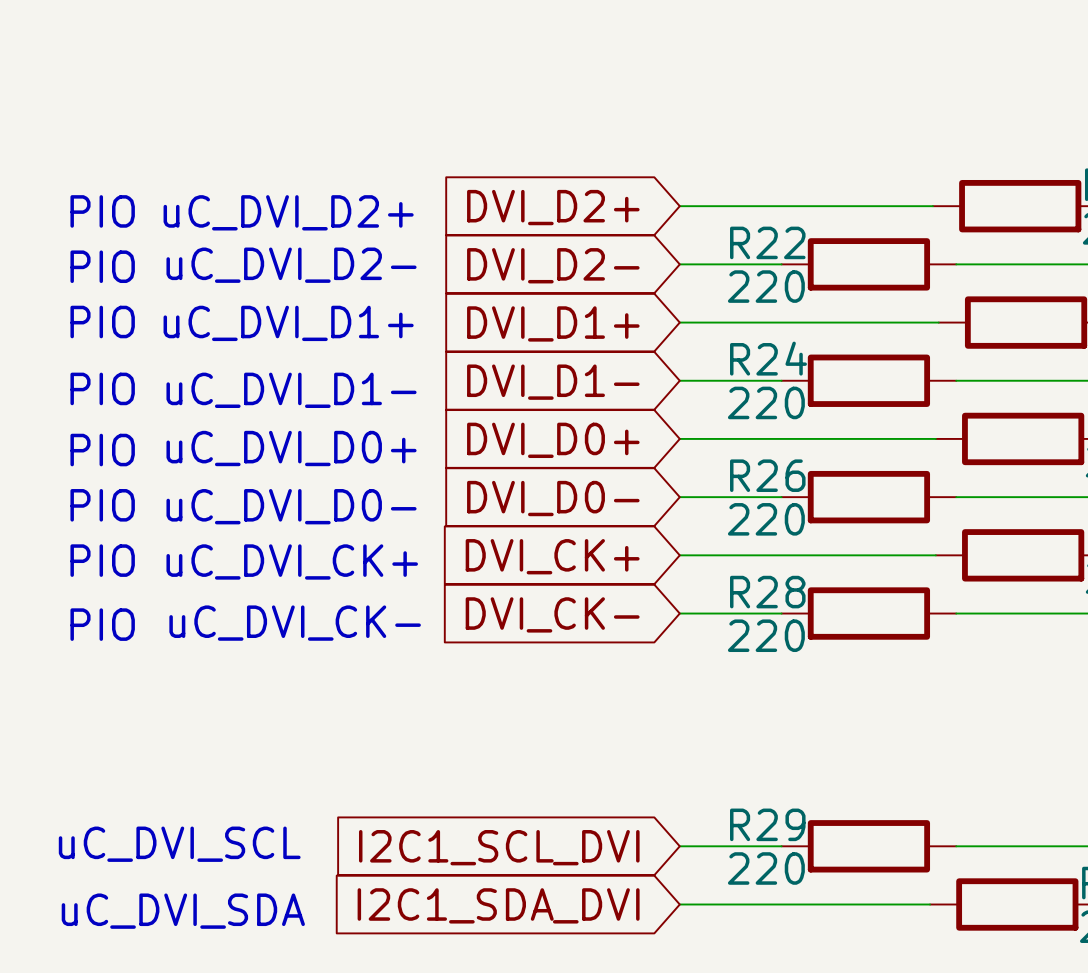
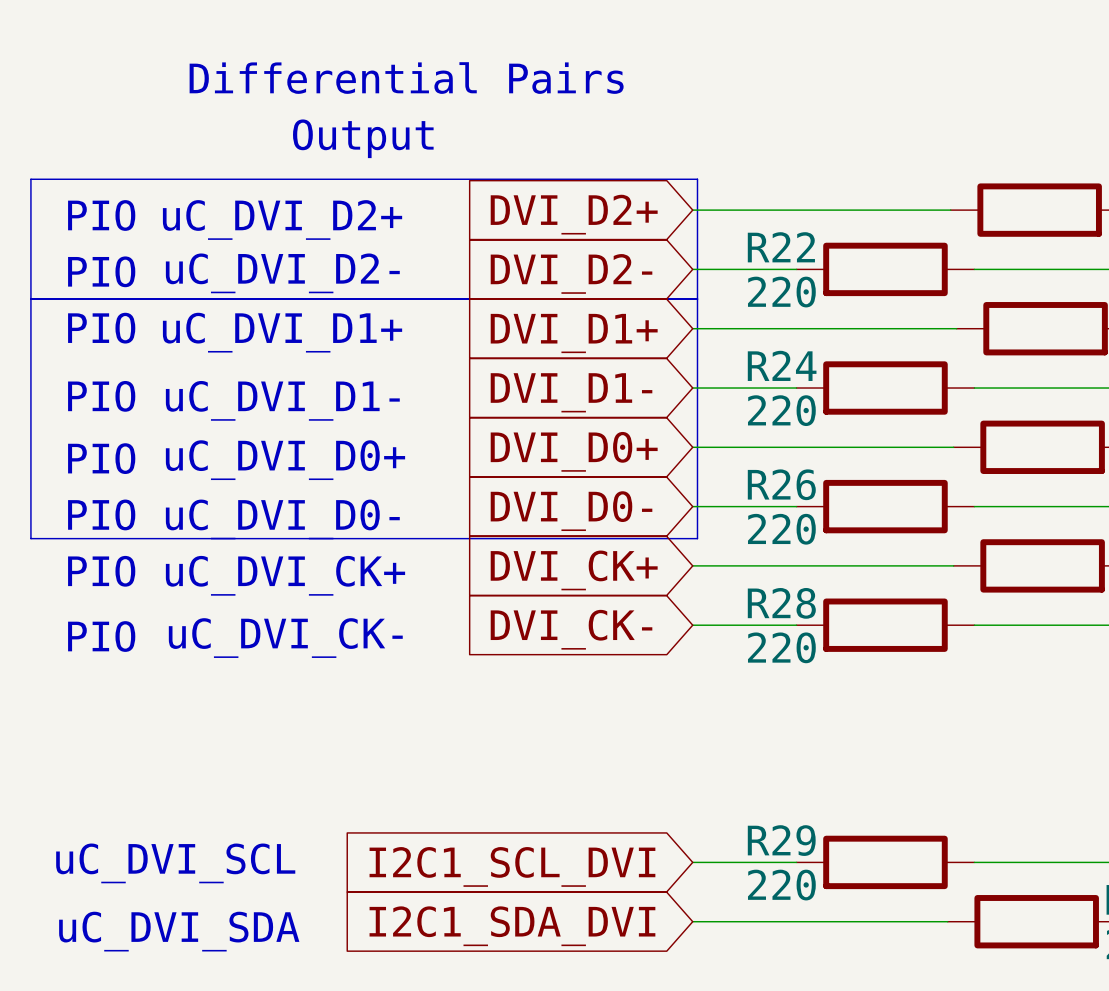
text: none -> Differential Pairs (406, 78)
text: none -> Output (363, 138)
line: none -> (30, 179) (697, 179) (697, 538) (30, 538) (30, 179)
line: none -> (30, 299) (697, 299)

